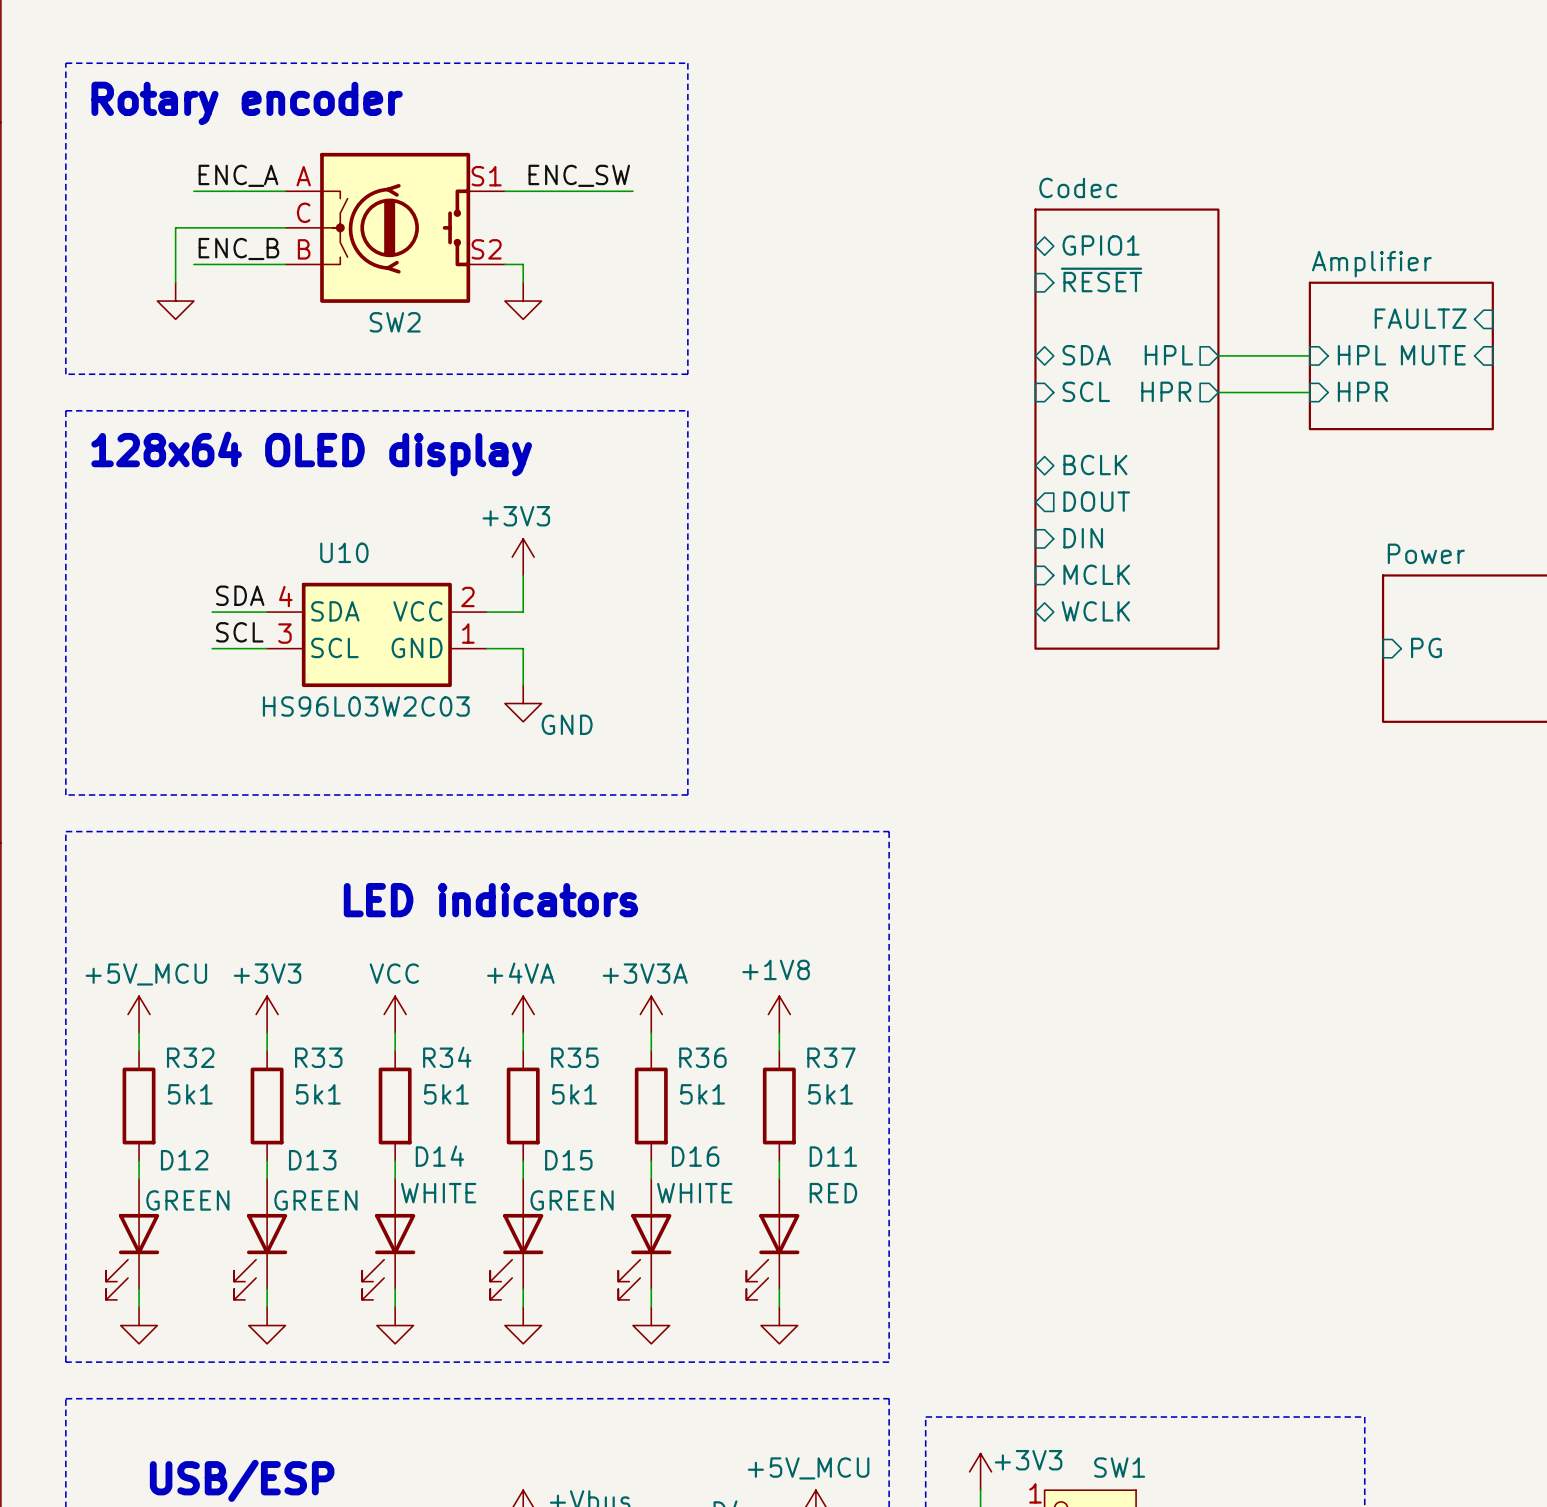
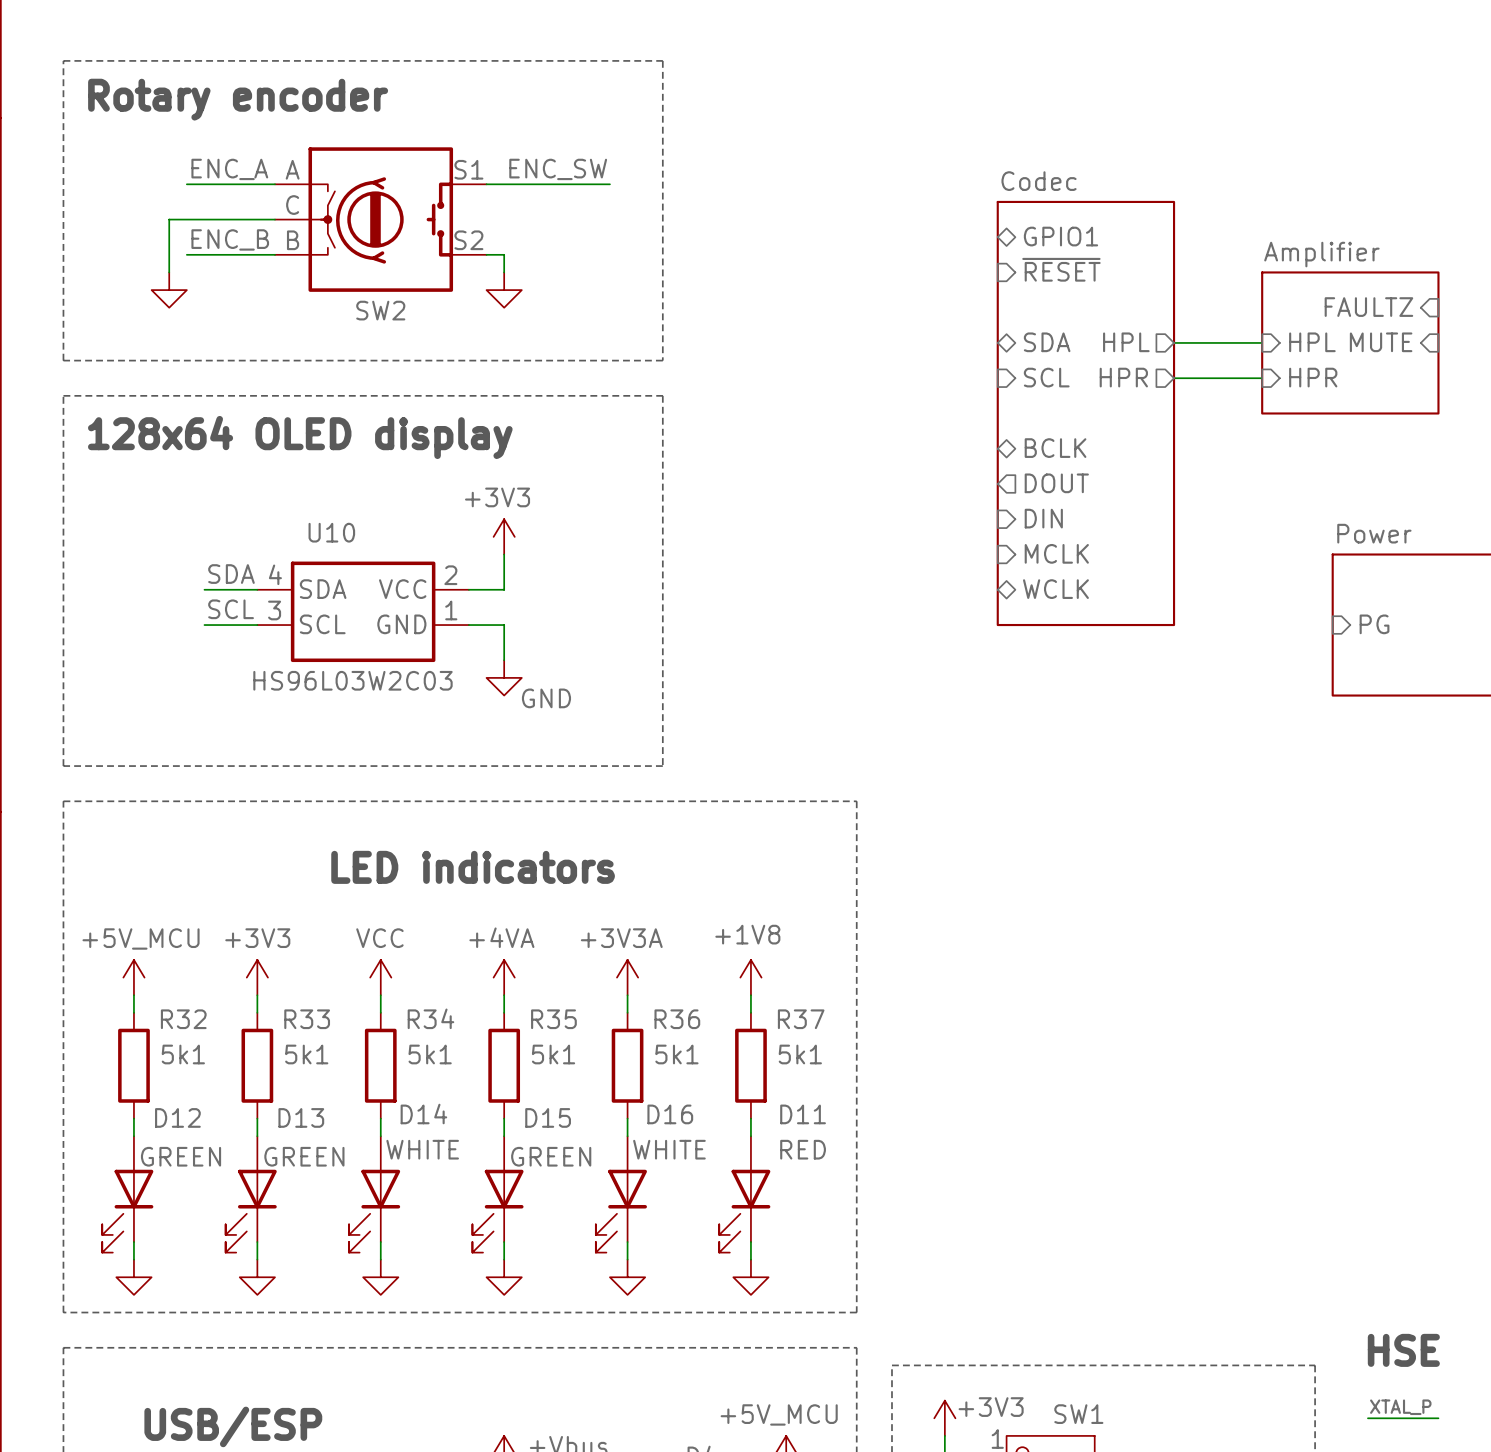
text: none -> HSE (1403, 1350)
label: none -> XTAL_P (1400, 1407)
wire: none -> (1367, 1418) (1438, 1418)

